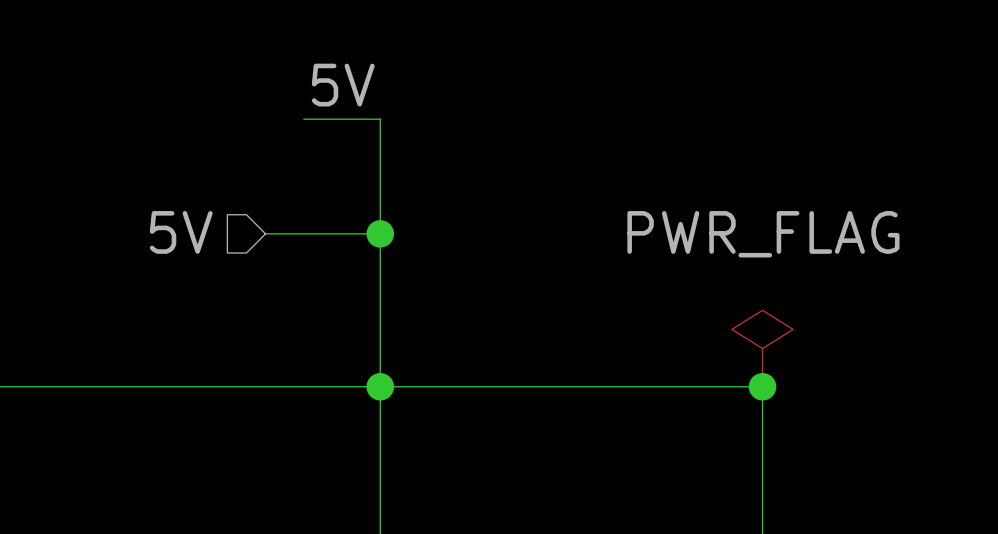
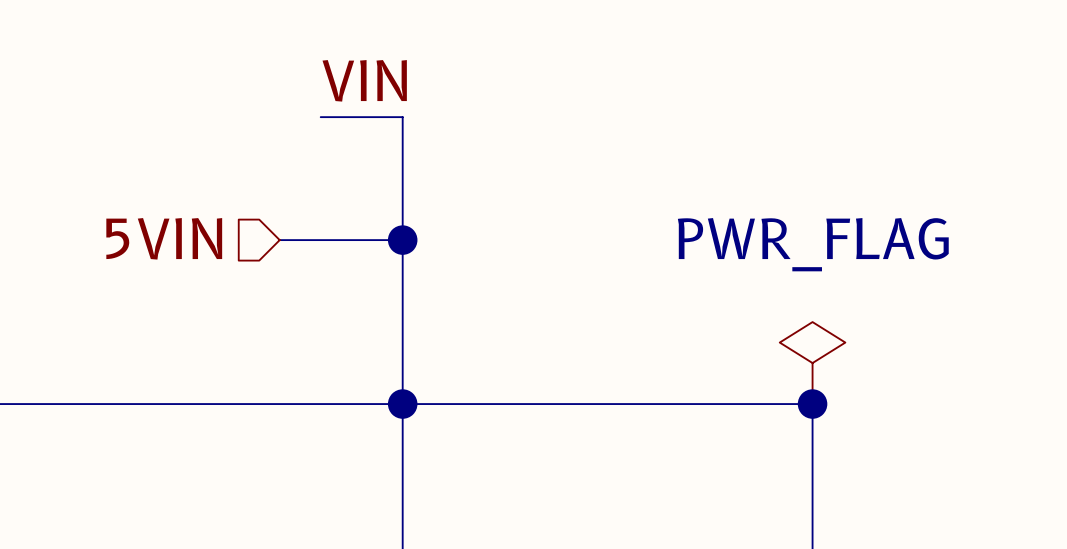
label: 5V (343, 85) -> VIN (364, 80)
hierarchical label: 5V (181, 232) -> 5VIN (164, 238)

